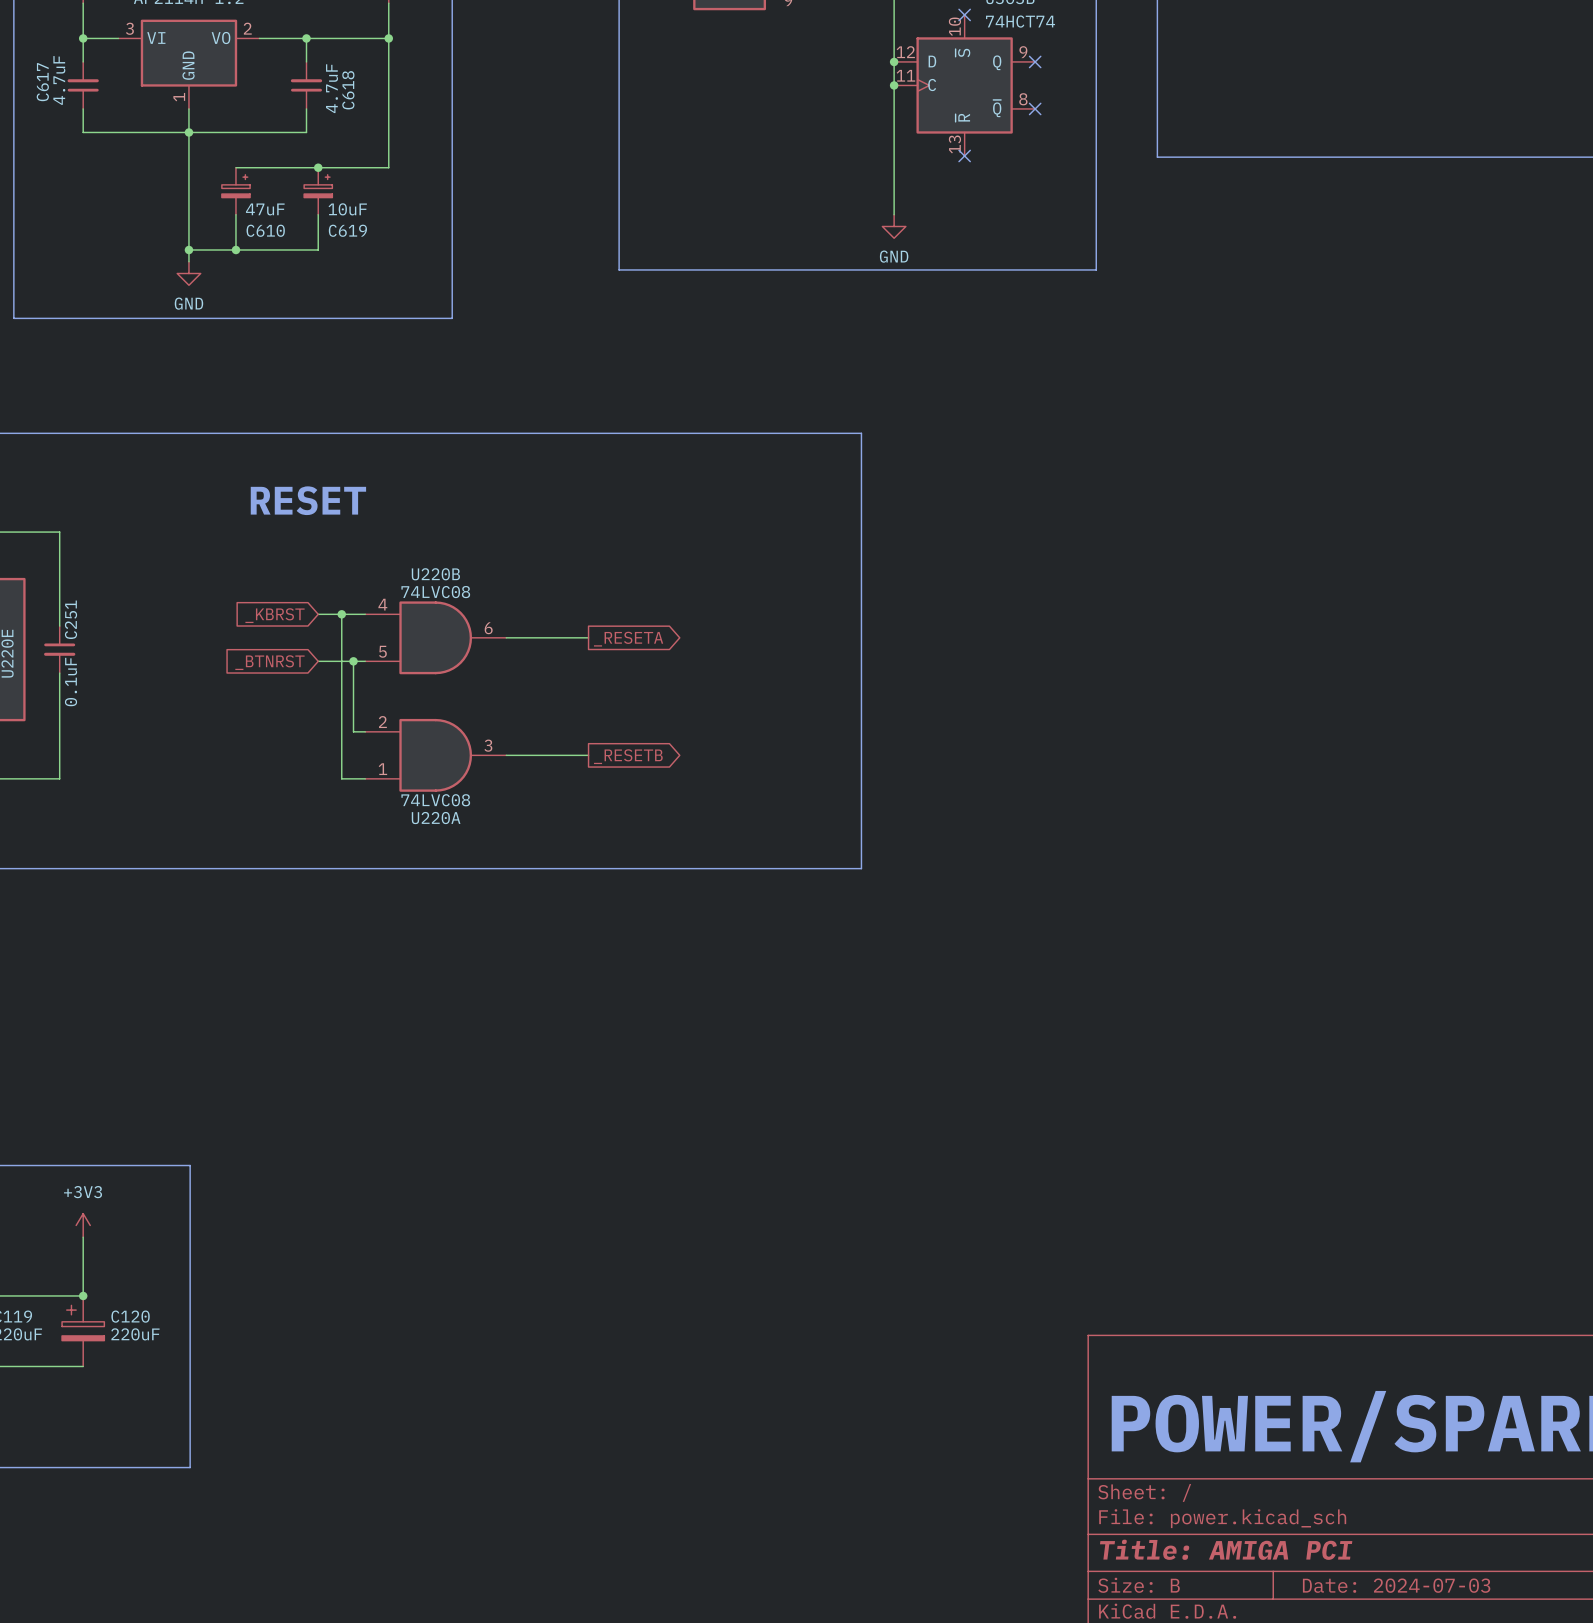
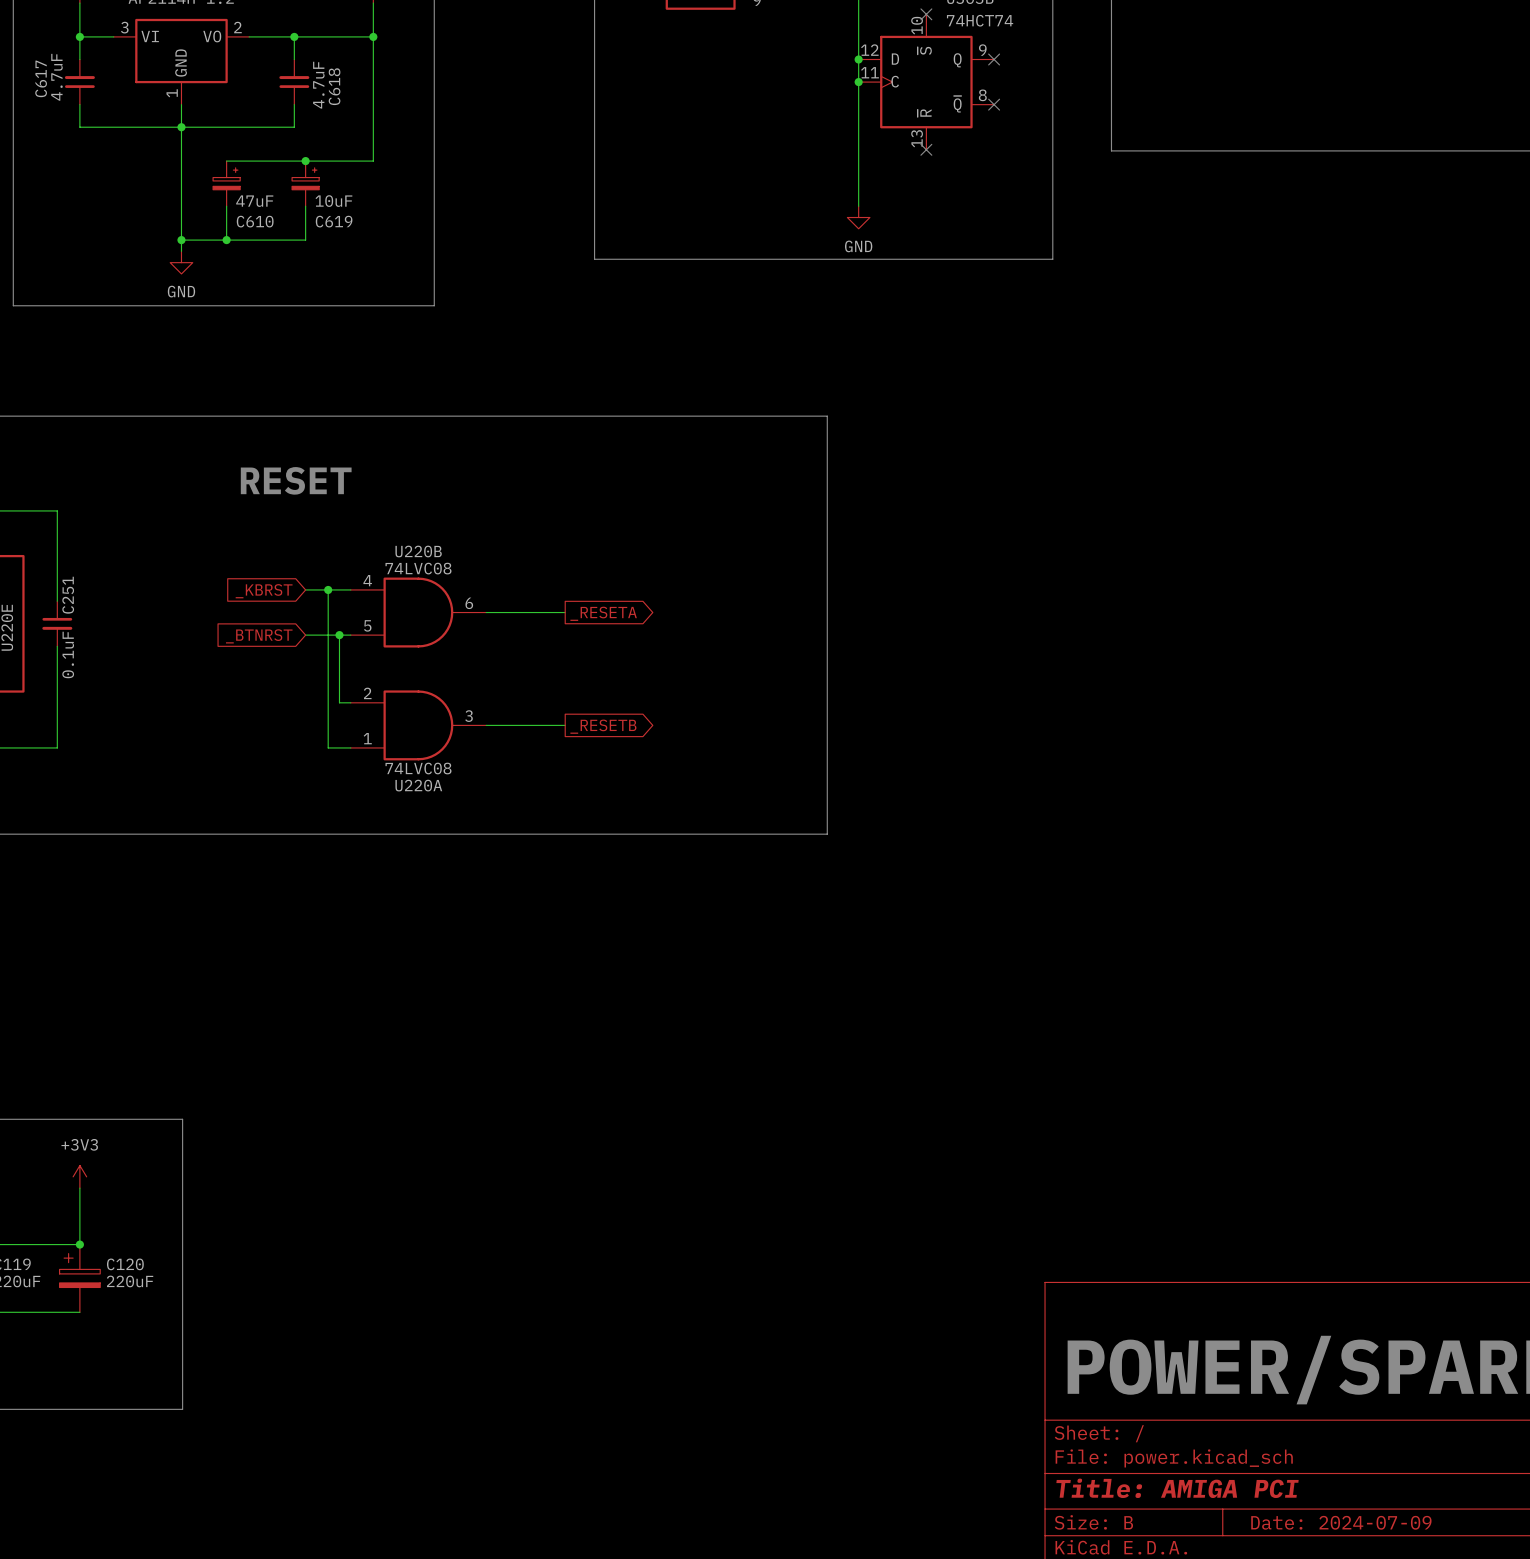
title block: Date: 2024-07-03 (1396, 1585) -> Date: 2024-07-09 (1341, 1522)

